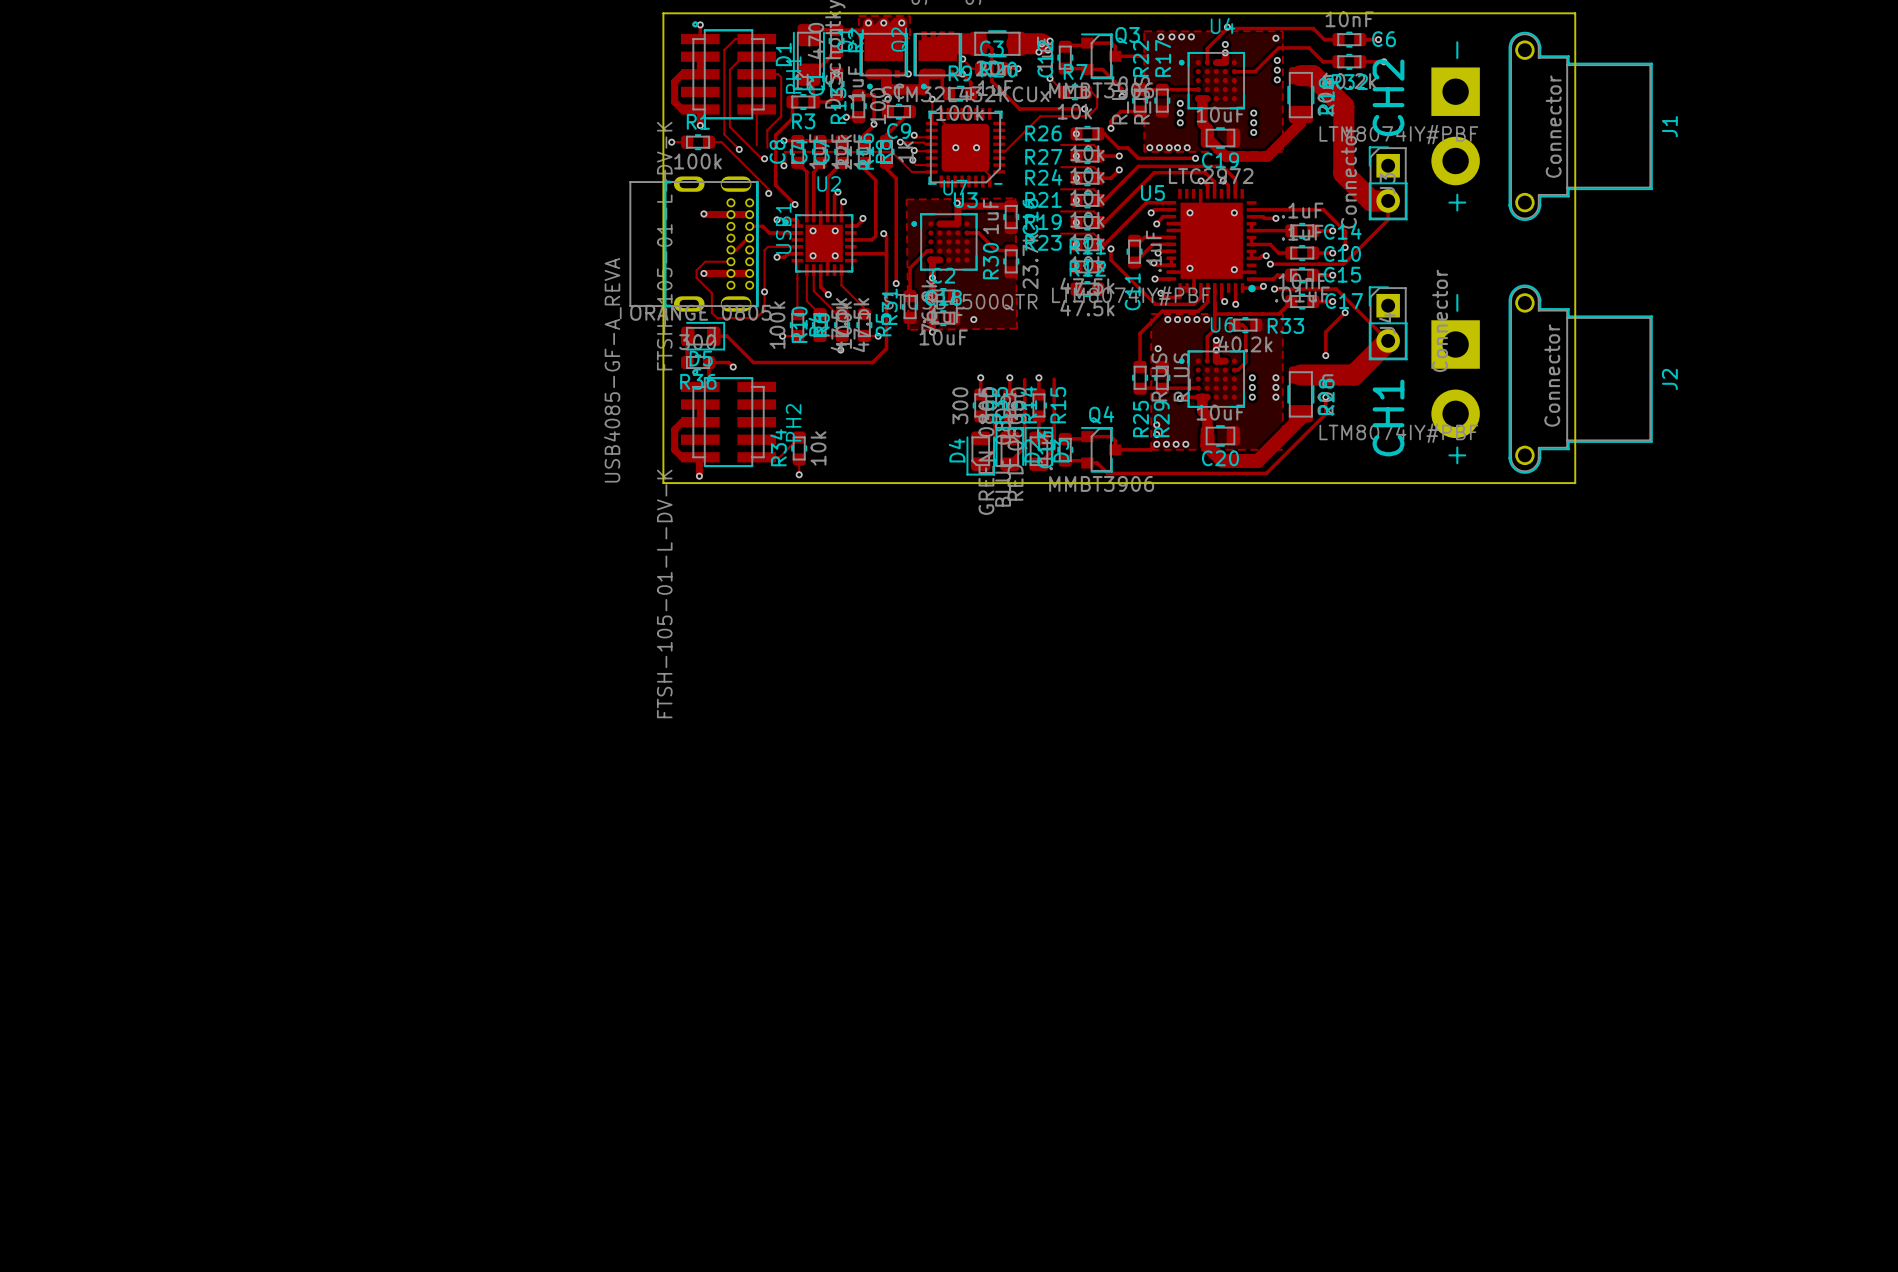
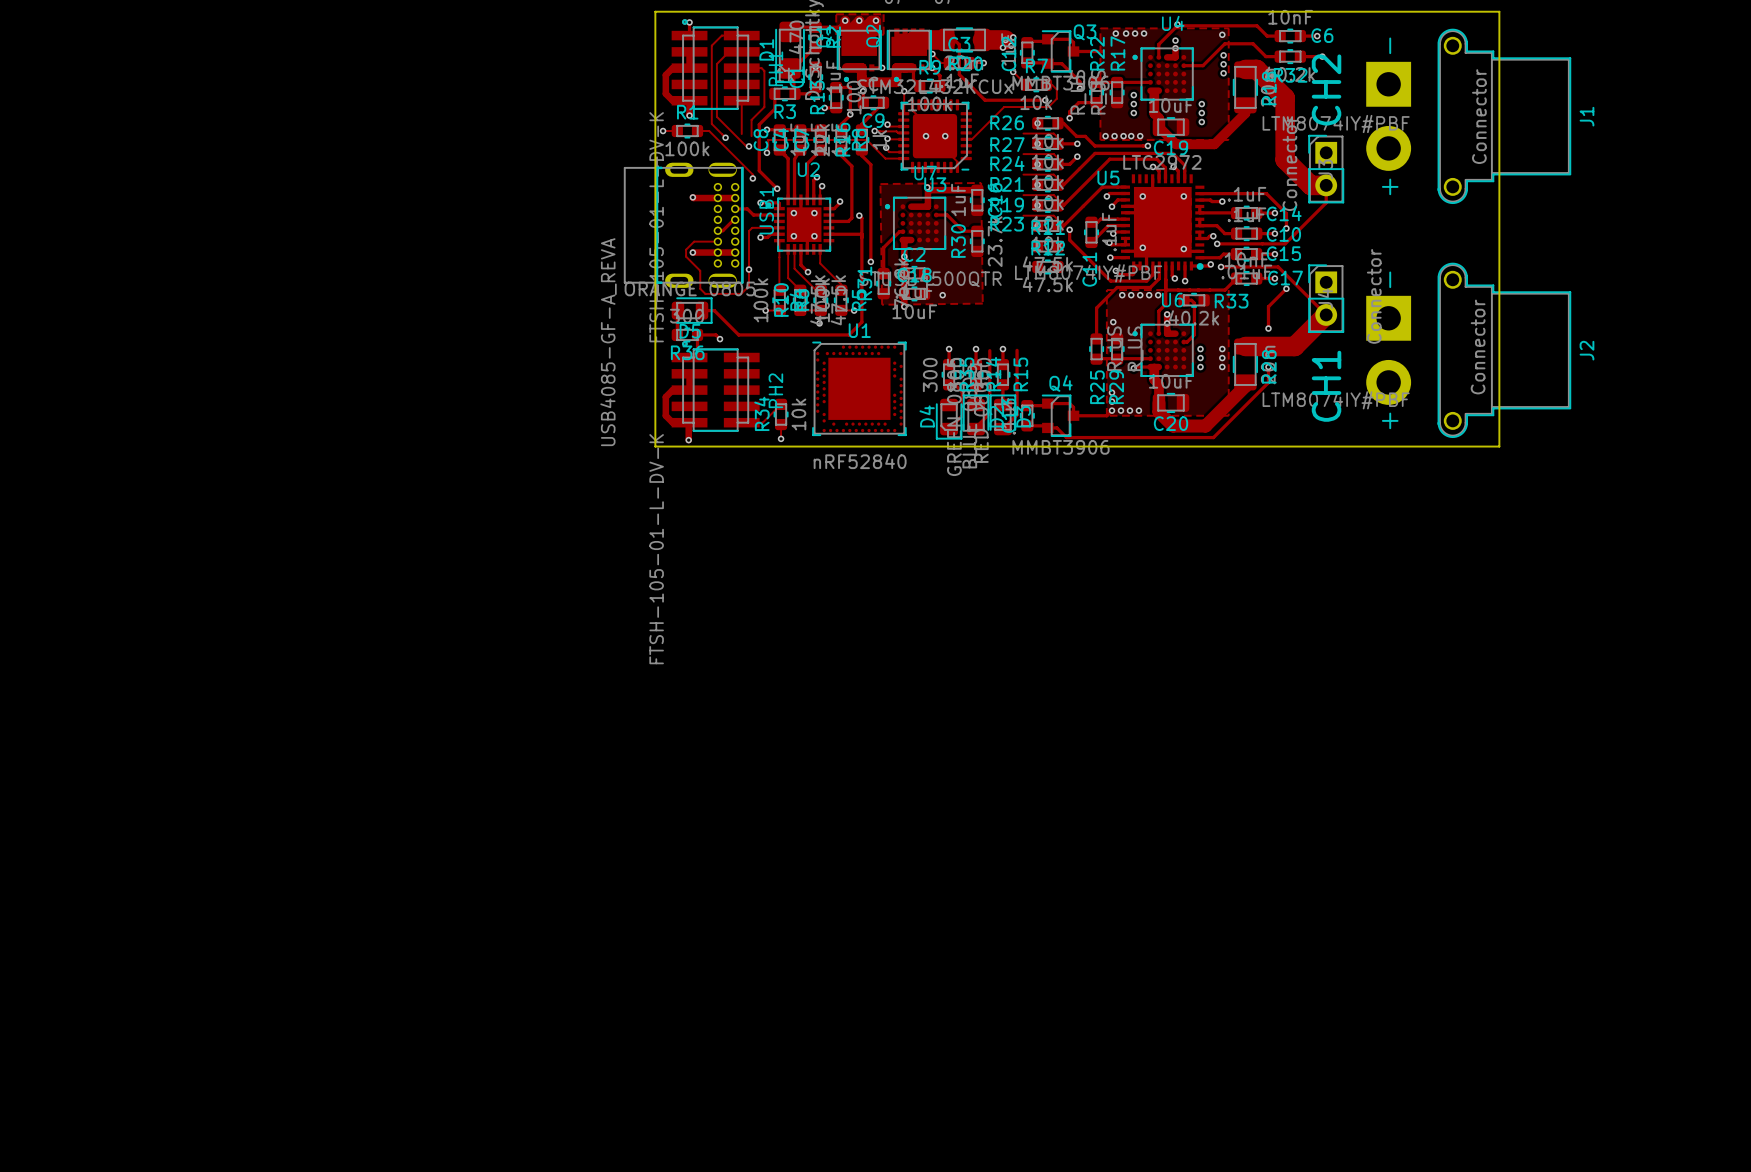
U1: none -> nRF52840 (859, 388)

